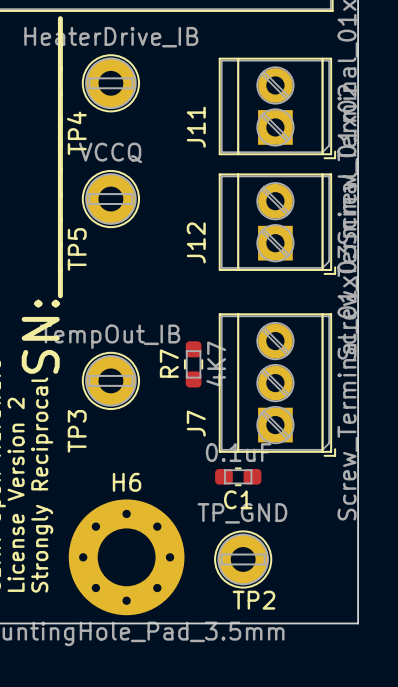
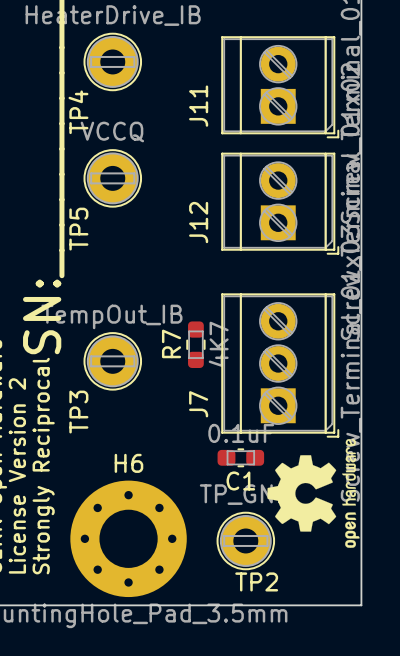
drawing: none -> [267, 439, 360, 548]

